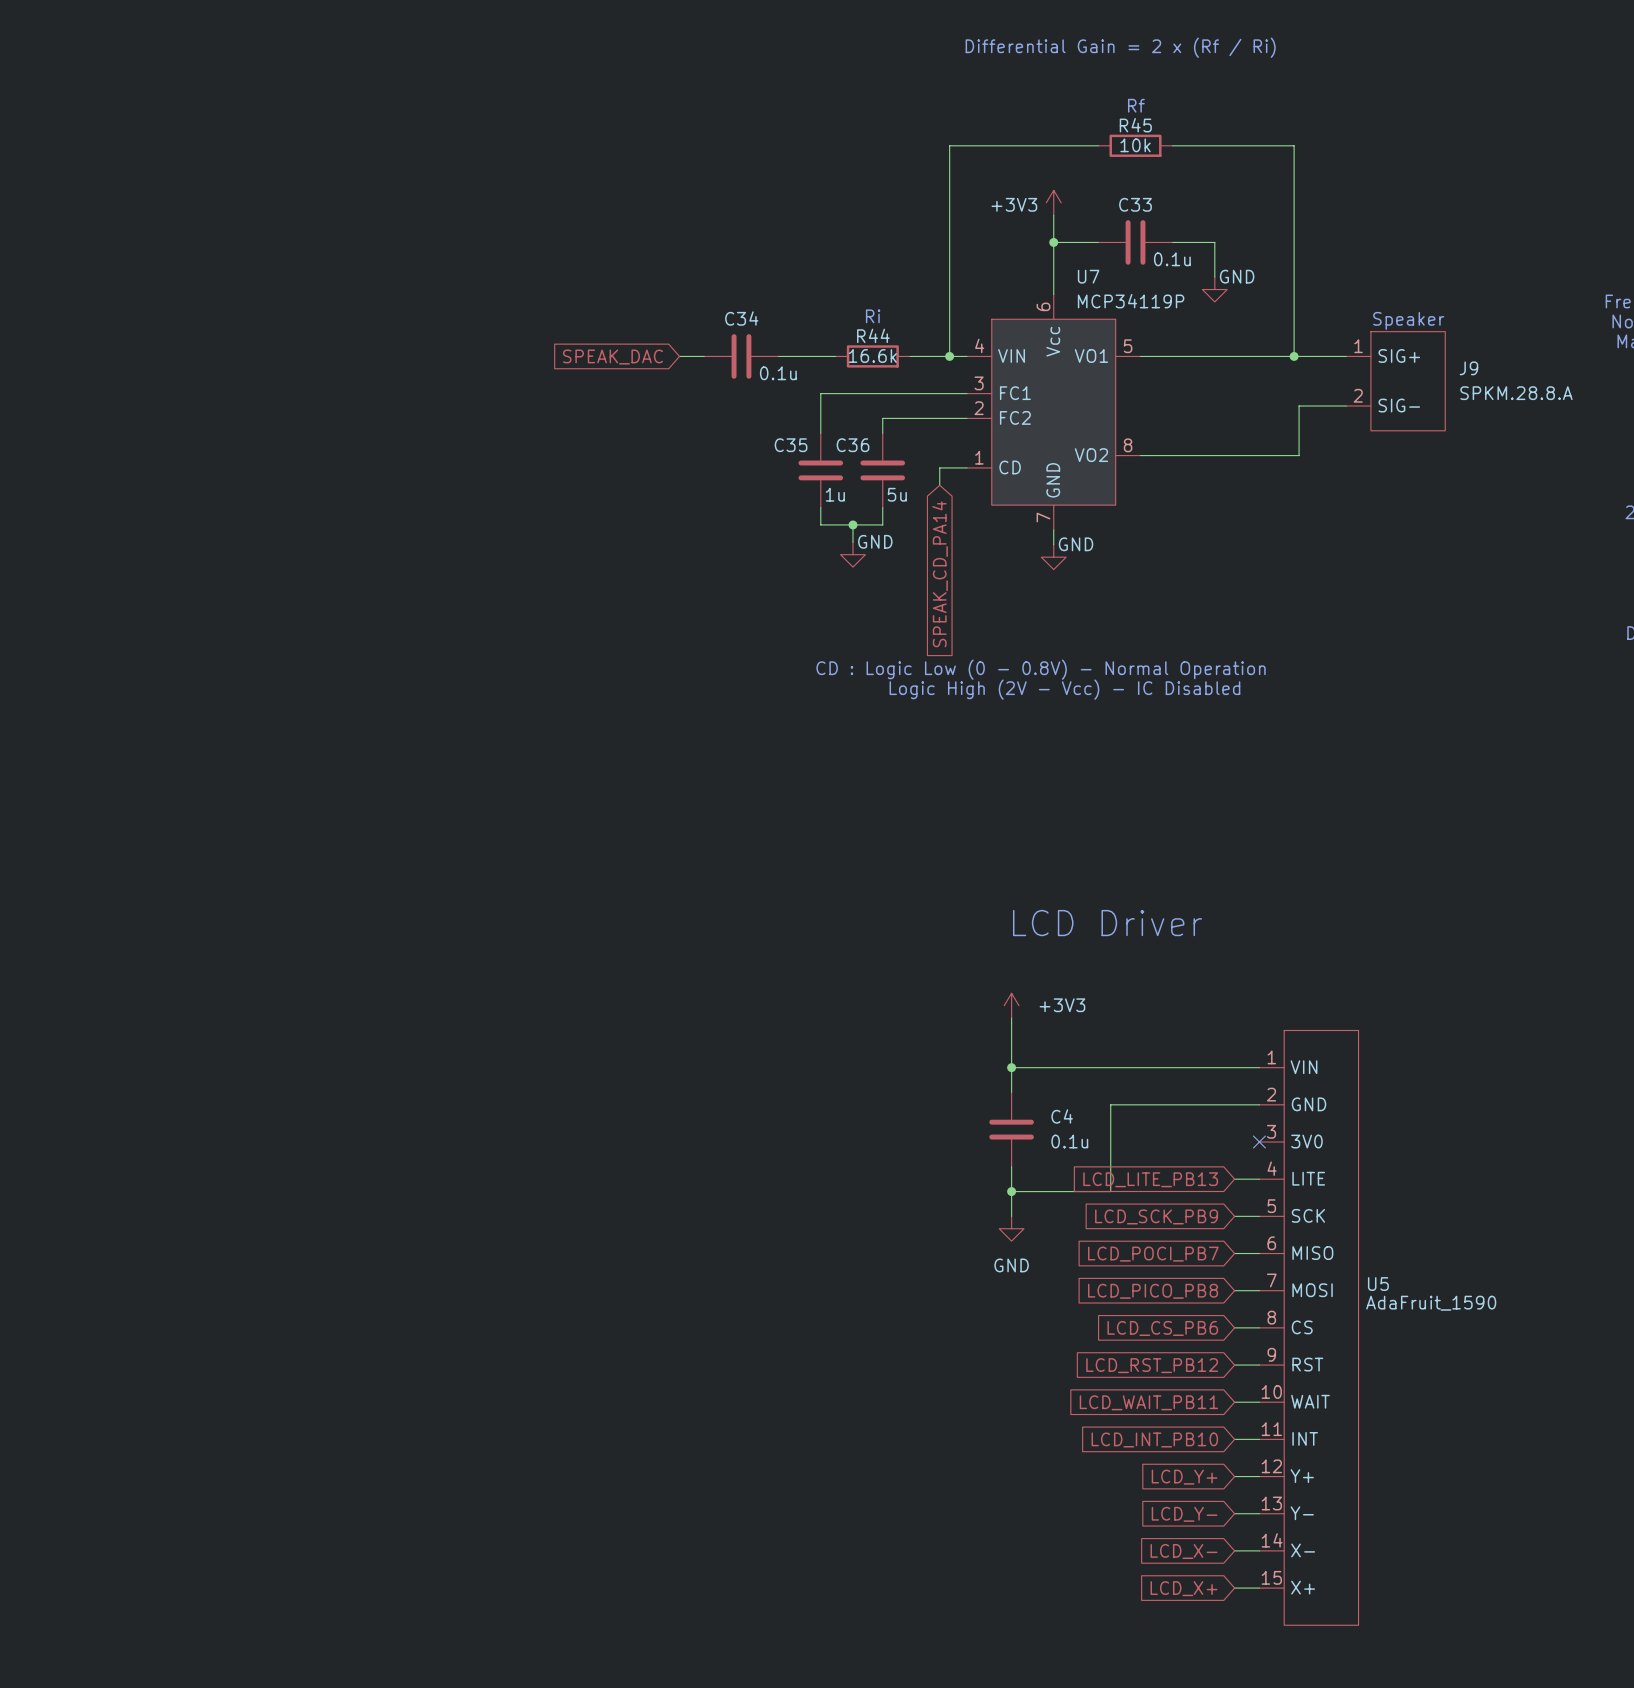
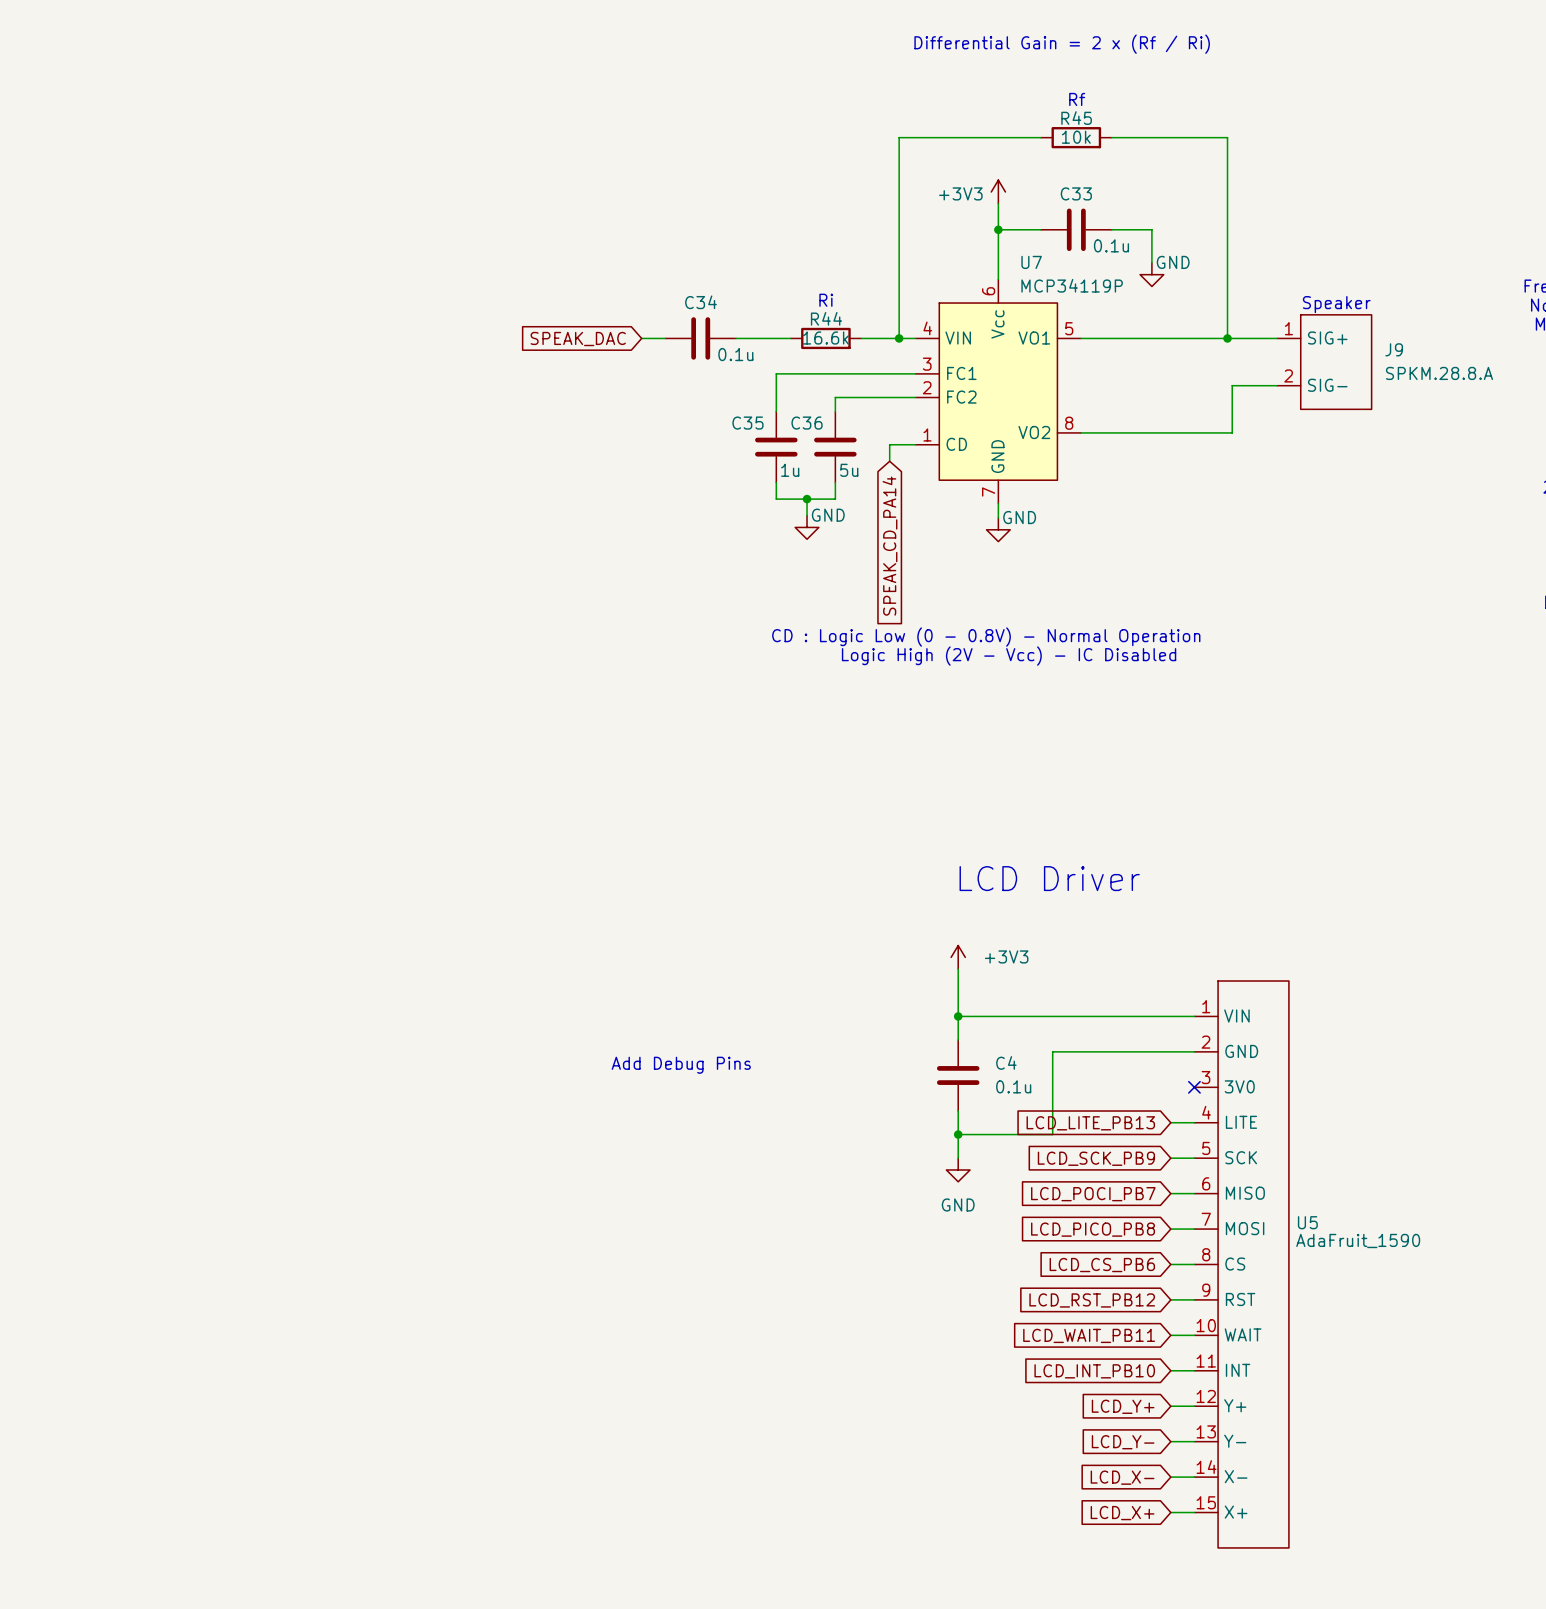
text: none -> Add Debug Pins (681, 1065)

